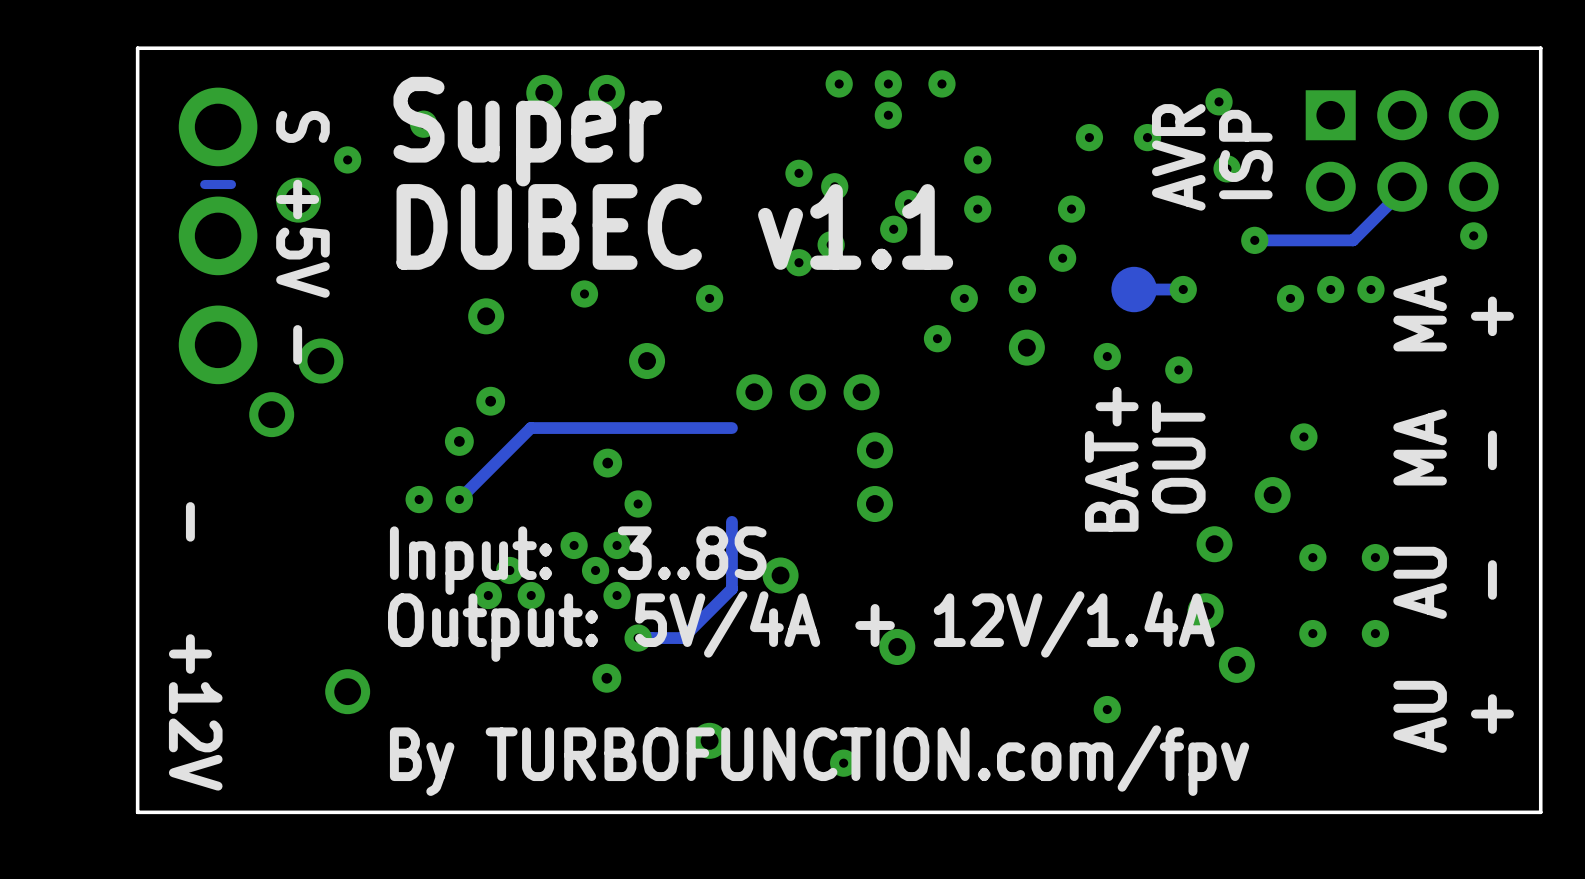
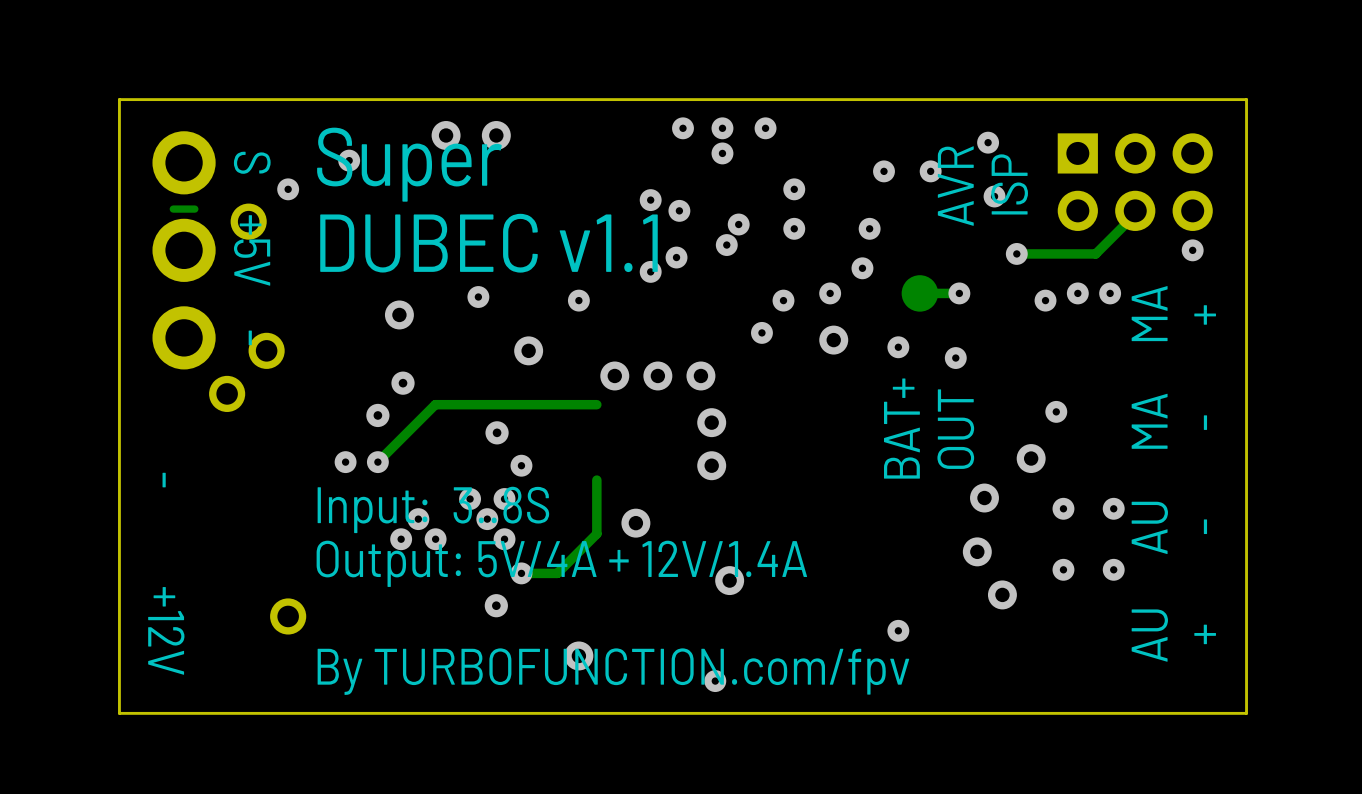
via position: (843, 763) -> (715, 681)

